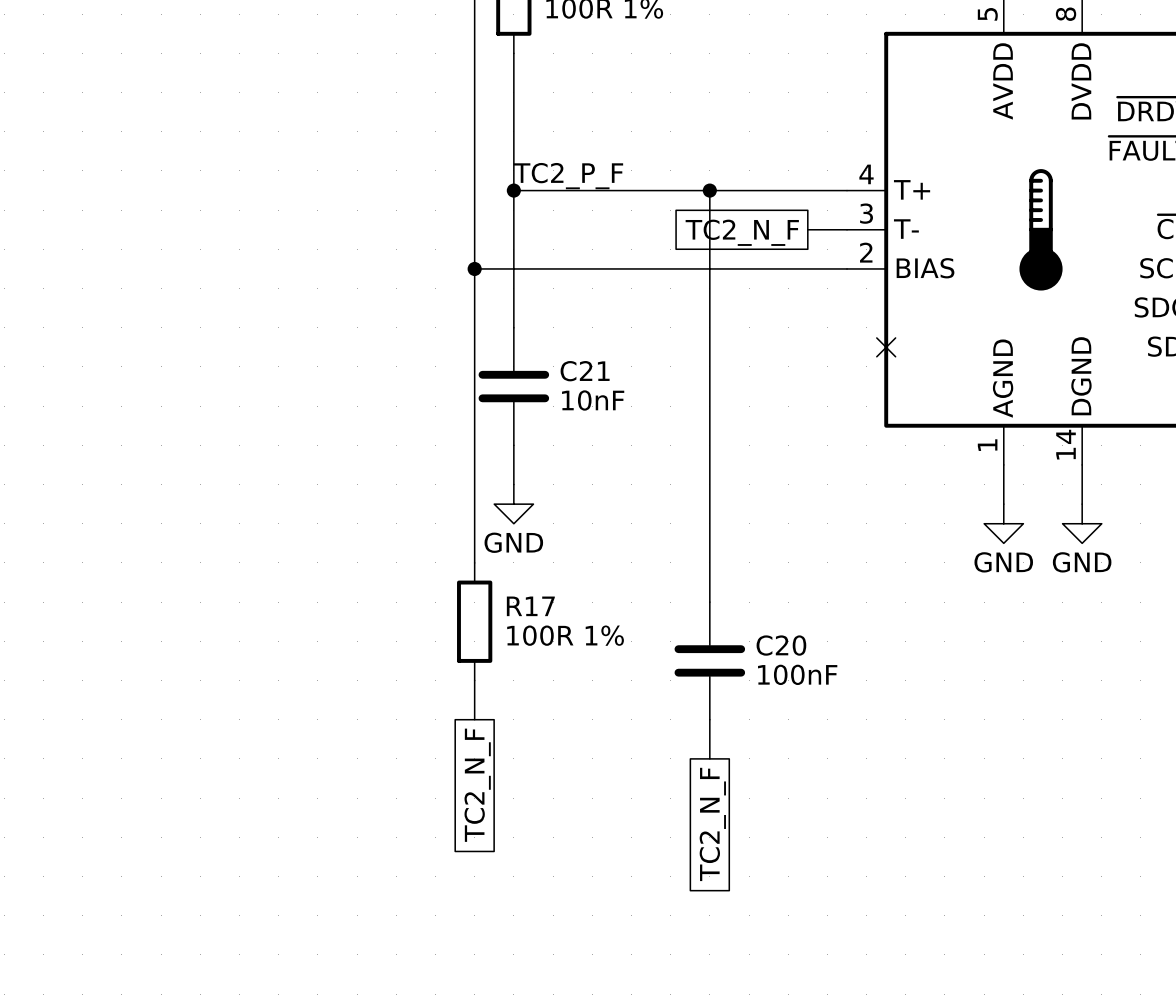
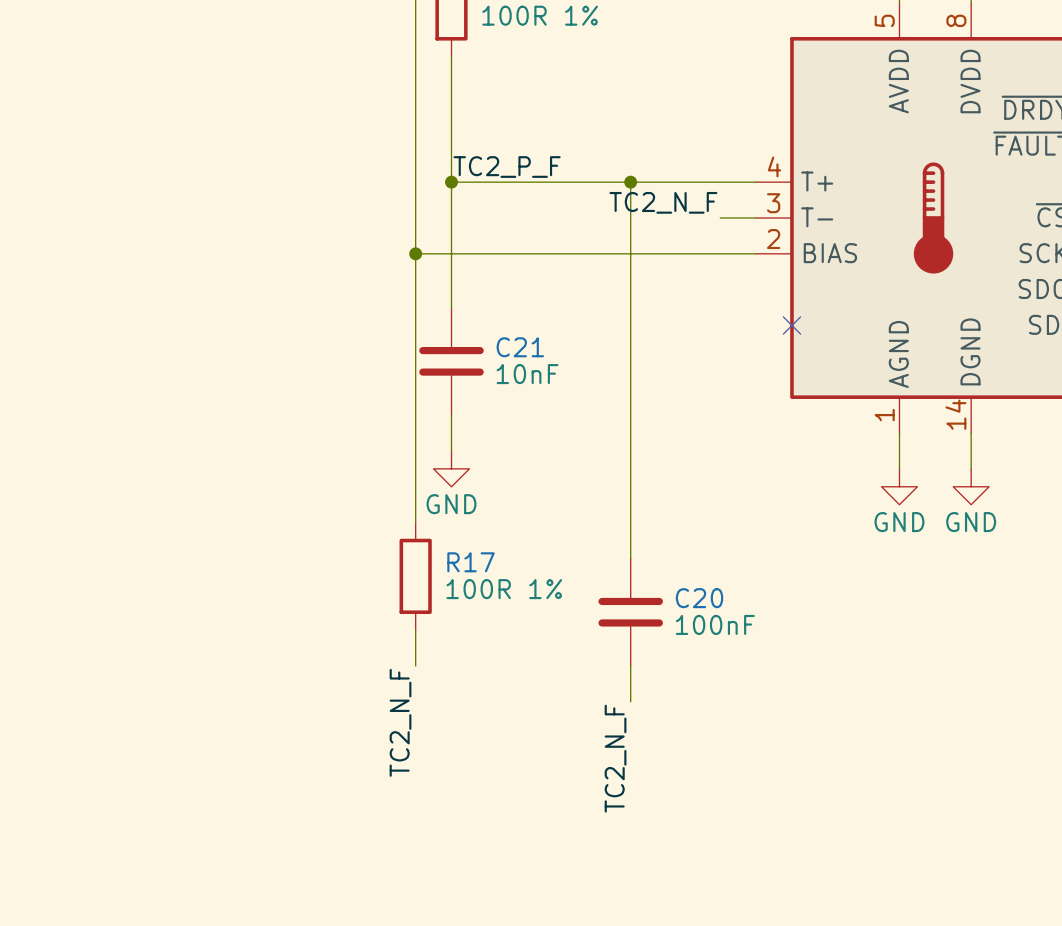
label: none -> TC2_N_F (663, 202)
global label: TC2_N_F (742, 232) -> none
label: none -> TC2_N_F (400, 722)
global label: TC2_N_F (477, 785) -> none
label: none -> TC2_N_F (615, 758)
global label: TC2_N_F (712, 824) -> none

